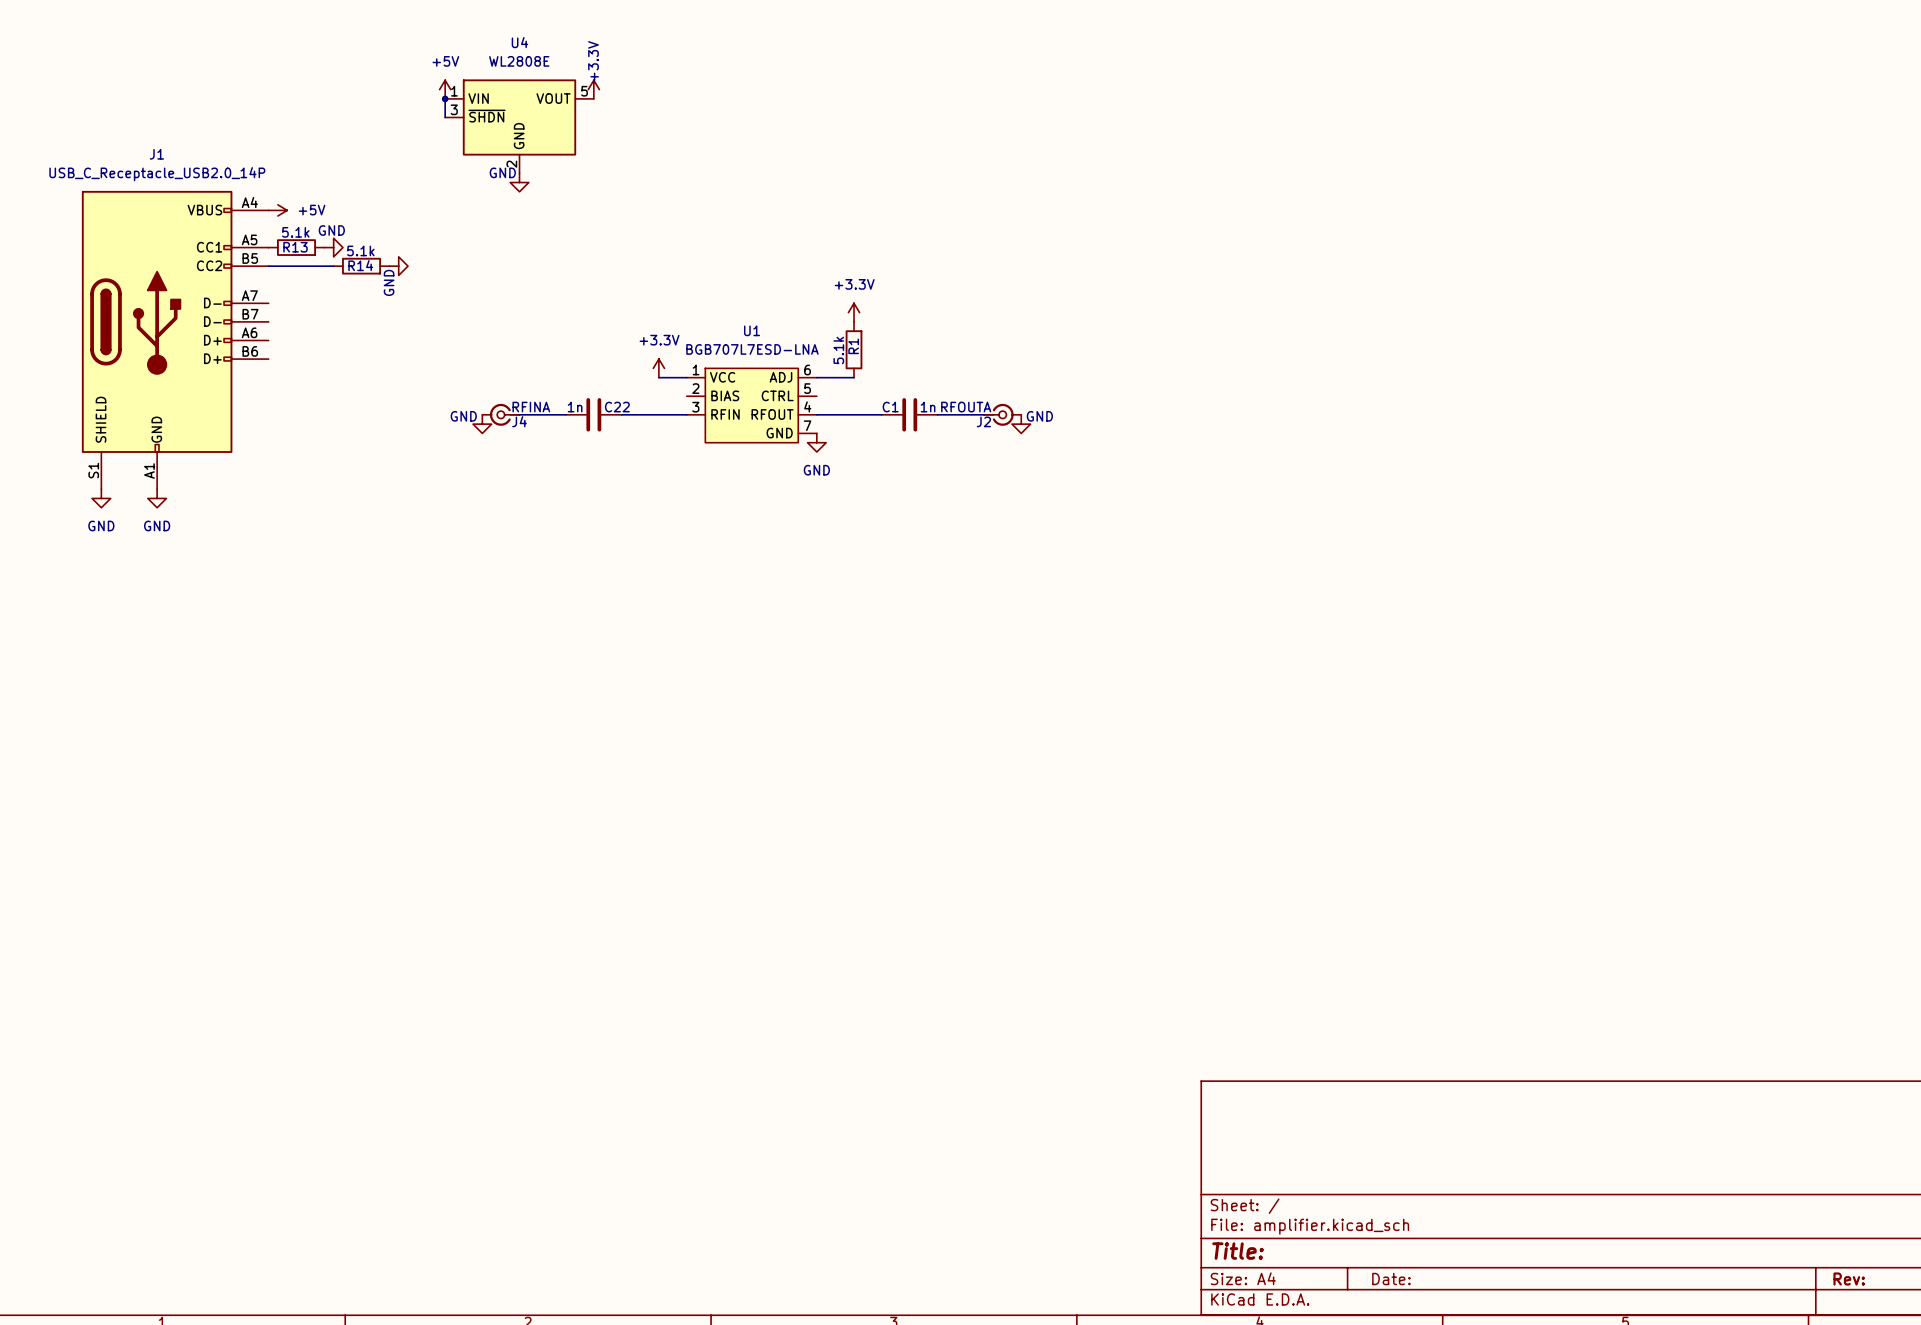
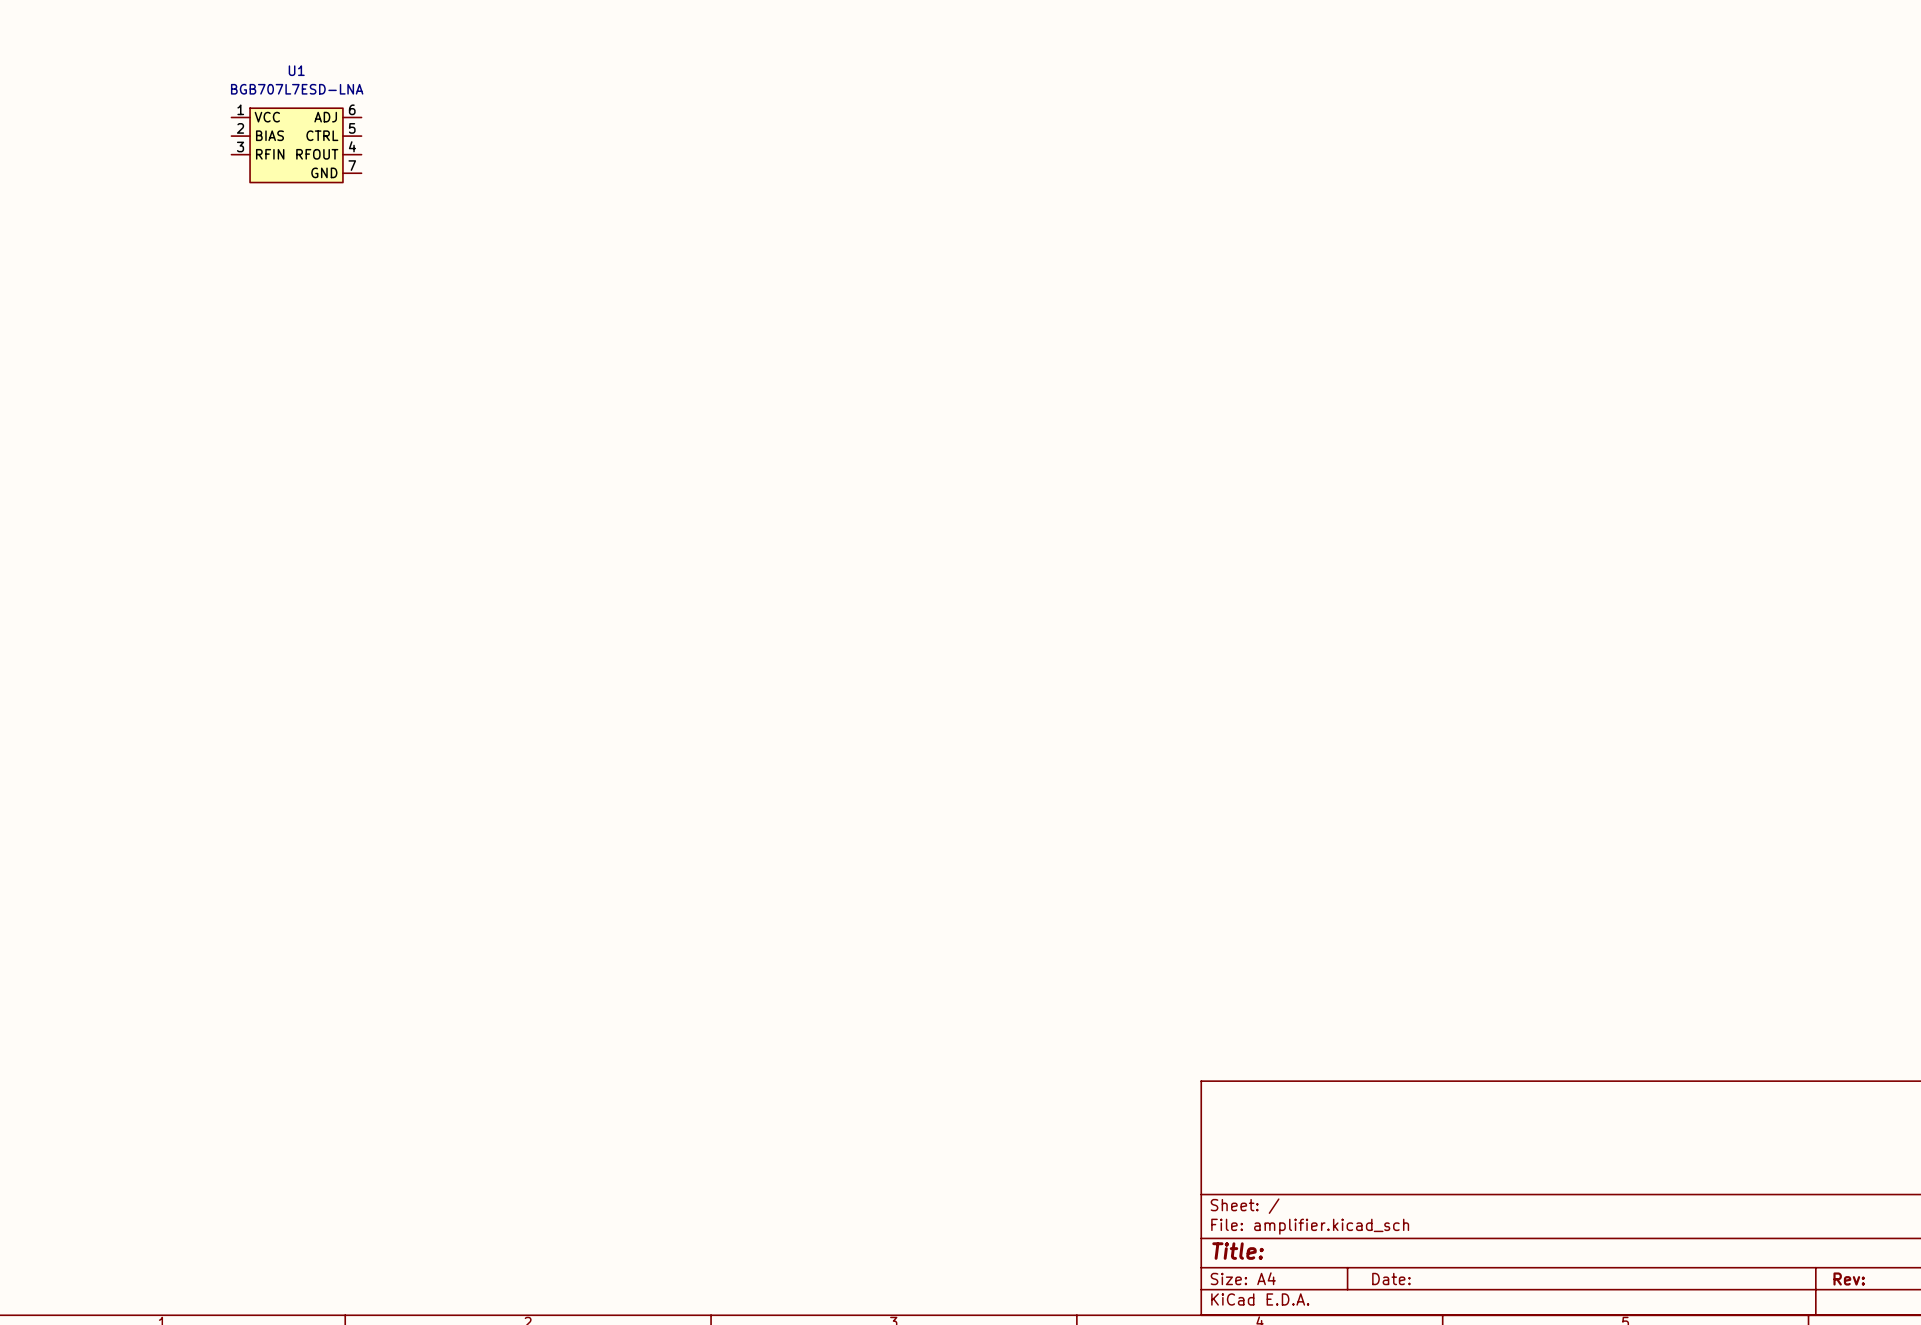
power symbol: +5V (445, 89) -> none
power symbol: +3.3V (593, 89) -> none
wire: (445, 98) (445, 117) -> none
junction: (445, 98) -> none
U4: WL2808E (519, 126) -> none
power symbol: GND (519, 182) -> none
power symbol: +5V (277, 210) -> none
R13: 5.1k (296, 247) -> none
power symbol: GND (333, 247) -> none
wire: (268, 266) (333, 266) -> none
R14: 5.1k (361, 266) -> none
power symbol: GND (398, 266) -> none
power symbol: +3.3V (854, 312) -> none
J1: USB_C_Receptacle_USB2.0_14P (175, 340) -> none
R1: 5.1k (854, 349) -> none
power symbol: +3.3V (658, 368) -> none
wire: (658, 377) (686, 377) -> none
wire: (816, 377) (854, 377) -> none
U1 position: (751, 405) -> (296, 145)
J4: RFINA (500, 414) -> none
wire: (519, 414) (565, 414) -> none
C22: 1n (593, 414) -> none
wire: (621, 414) (686, 414) -> none
wire: (816, 414) (881, 414) -> none
C1: 1n (909, 414) -> none
wire: (937, 414) (984, 414) -> none
J2: RFOUTA (1002, 414) -> none
power symbol: GND (482, 424) -> none
power symbol: GND (1021, 424) -> none
power symbol: GND (816, 442) -> none
power symbol: GND (101, 498) -> none
power symbol: GND (157, 498) -> none

